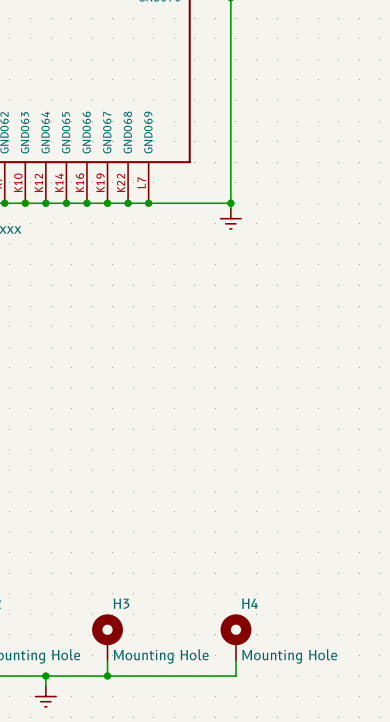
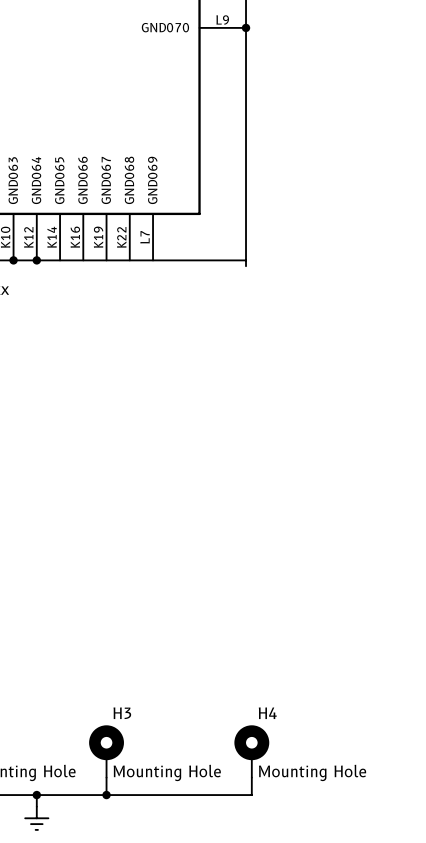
junction: (66, 203) -> none
junction: (86, 203) -> none
junction: (107, 203) -> none
junction: (128, 203) -> none
junction: (148, 203) -> none
junction: (230, 203) -> none
power symbol: (230, 218) -> none

